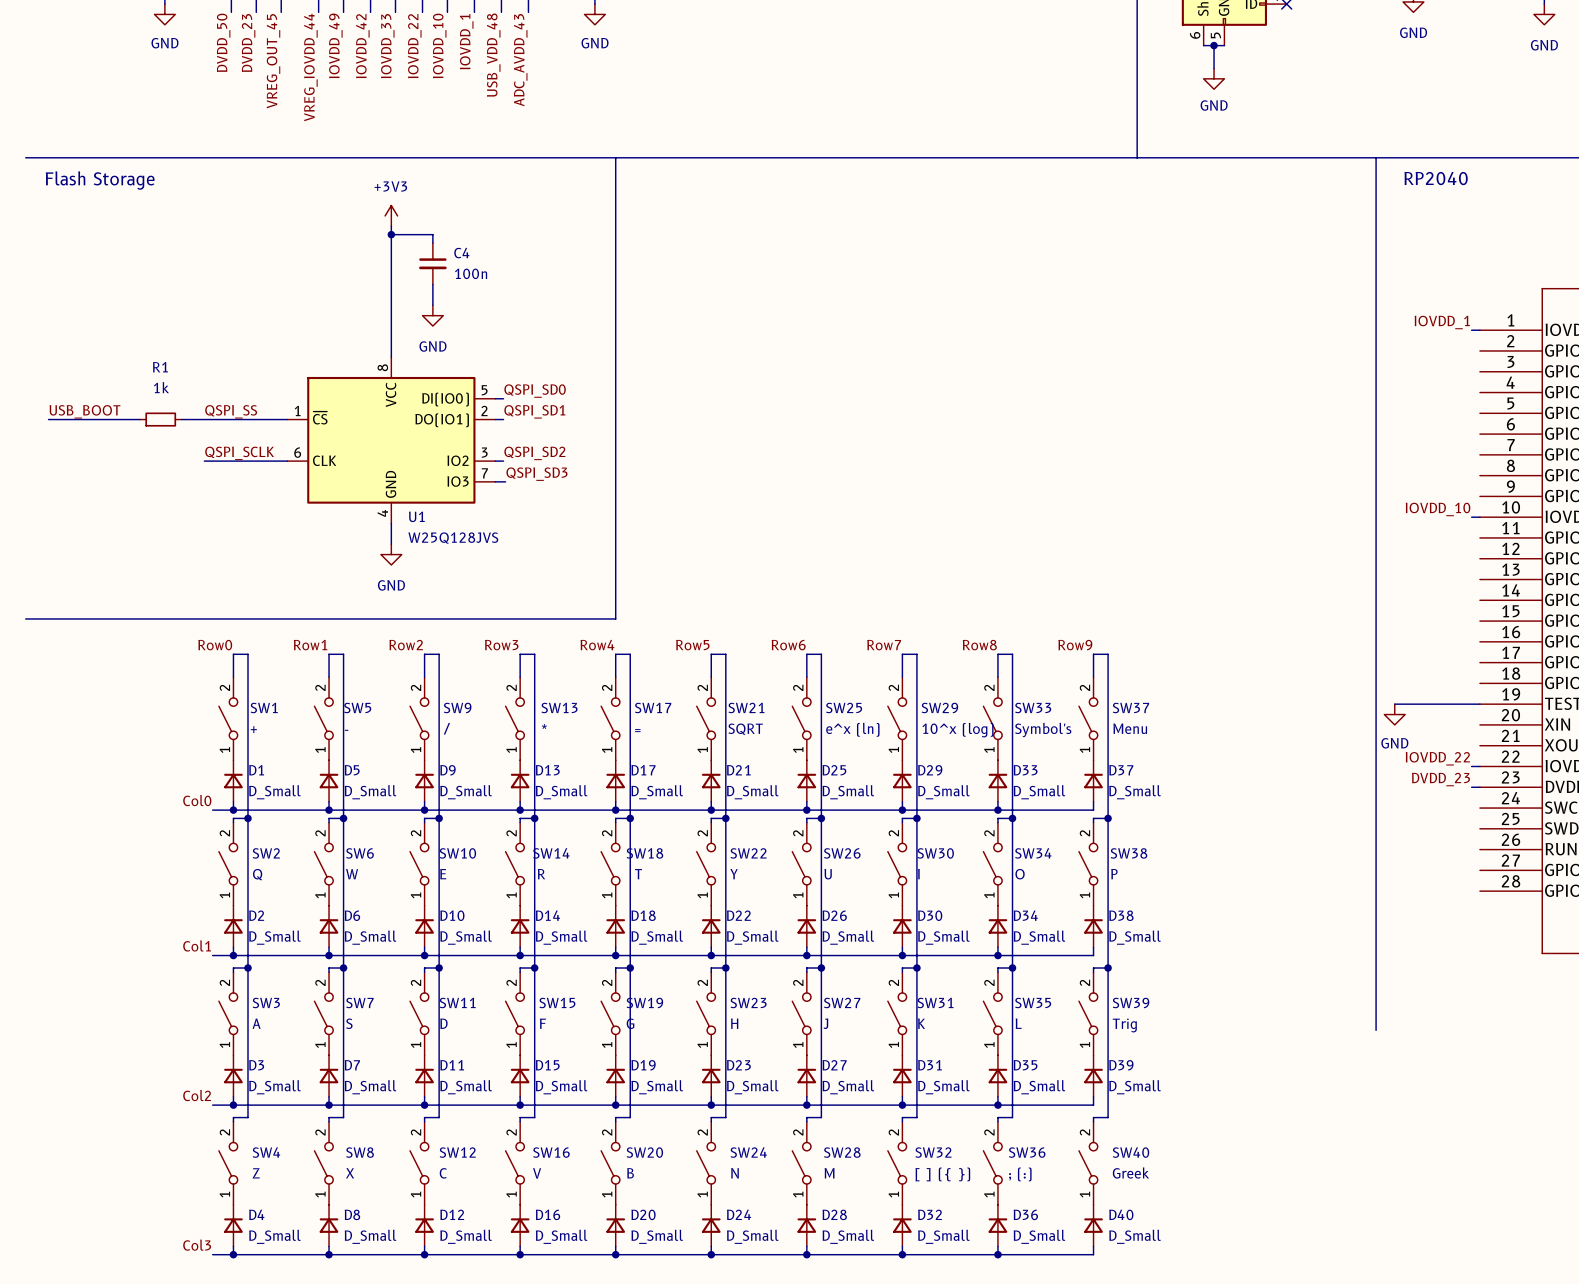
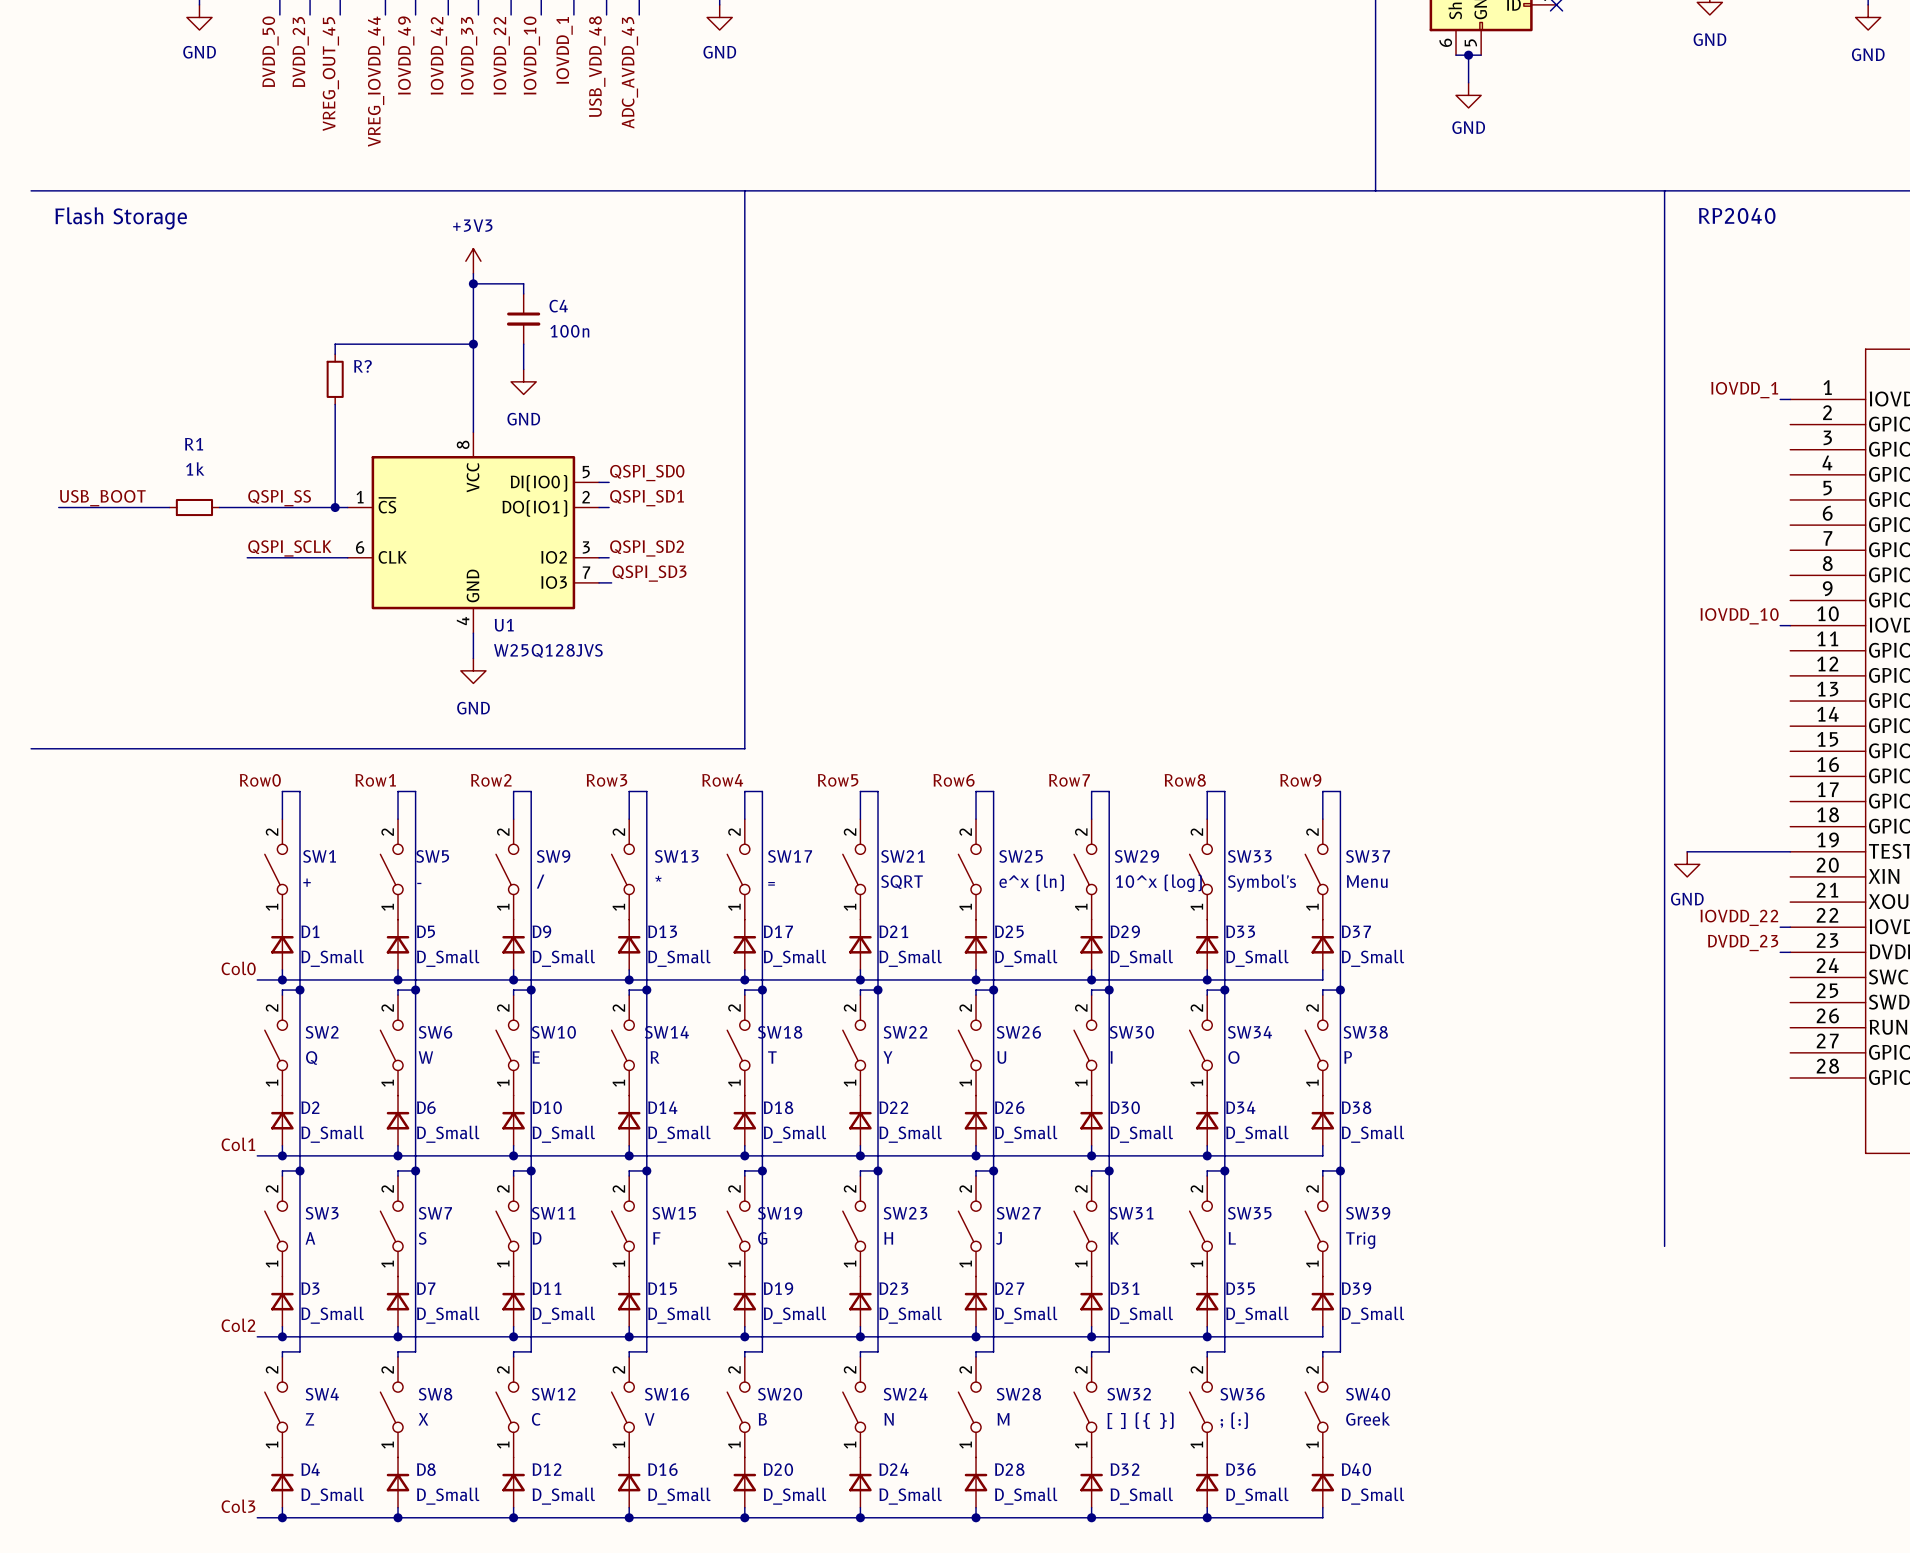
wire: none -> (473, 344) (335, 344) (335, 354)
junction: none -> (473, 344)
R?: none -> (335, 379)
wire: none -> (335, 404) (335, 507)
junction: none -> (335, 507)

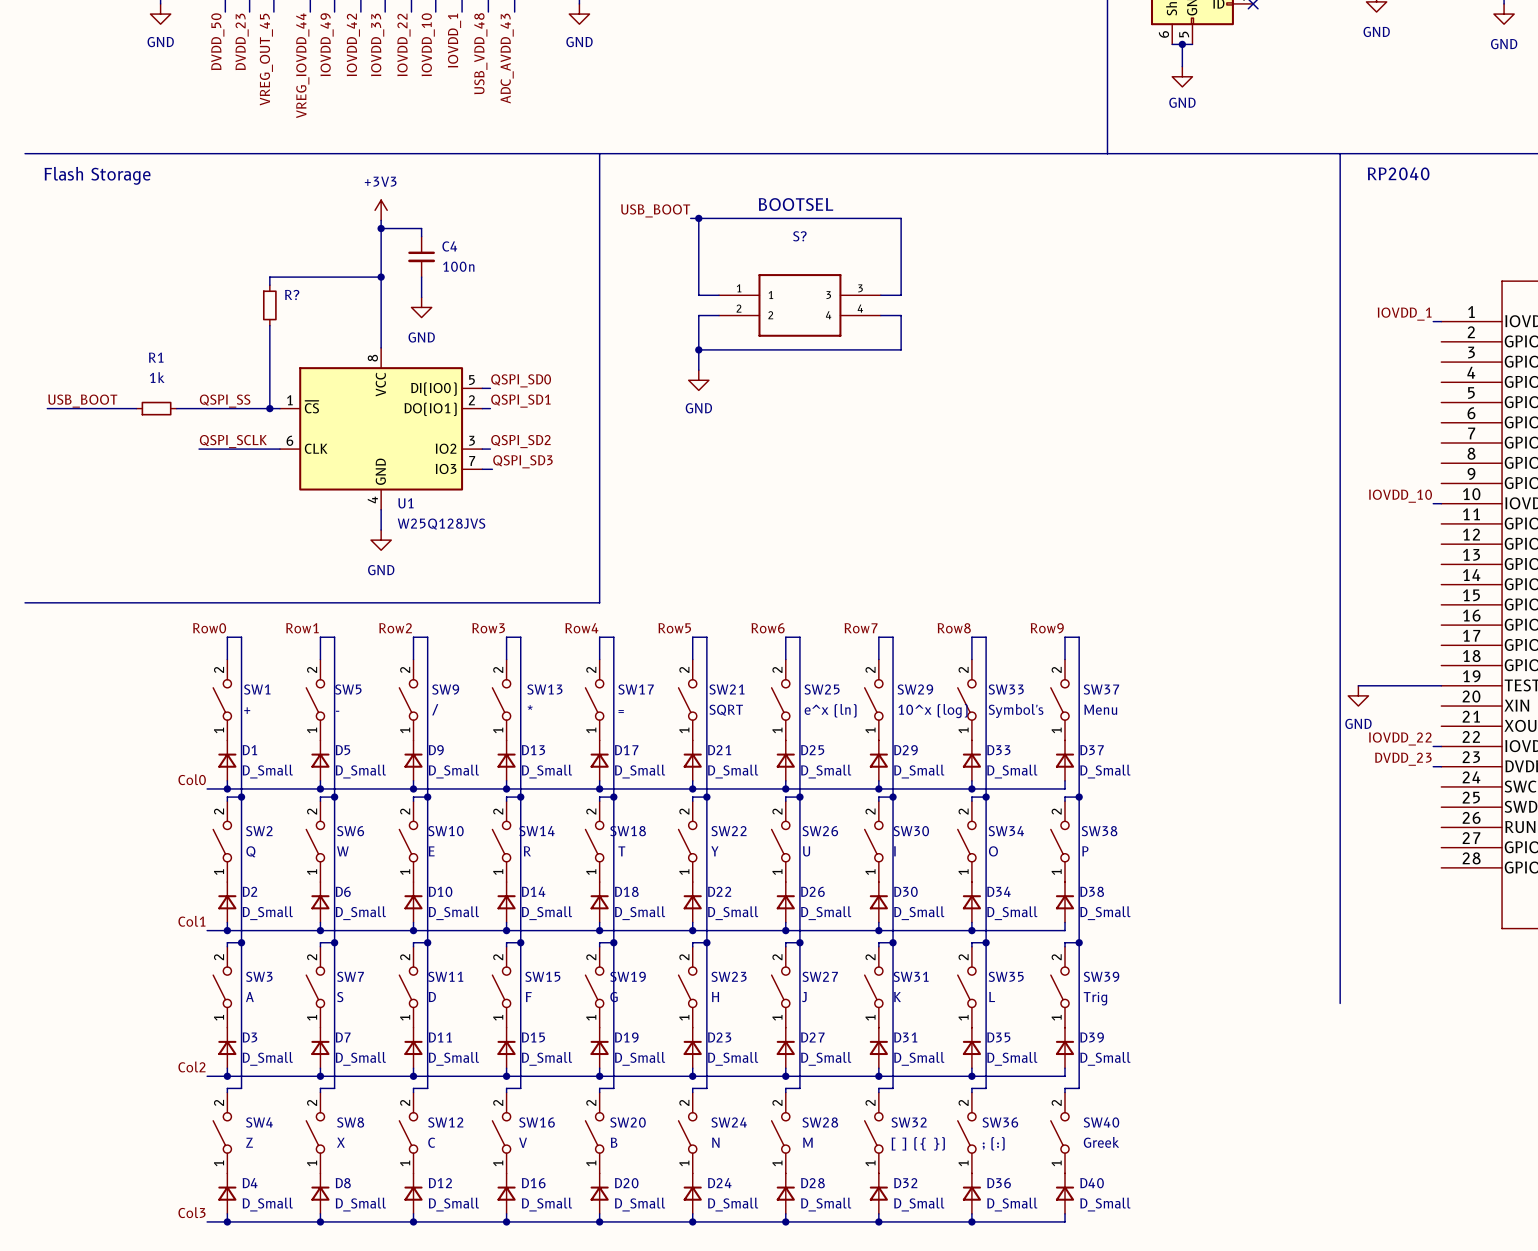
text: none -> BOOTSEL (796, 204)
label: none -> USB_BOOT (655, 210)
wire: none -> (690, 218) (901, 218) (901, 295) (880, 295)
wire: none -> (698, 218) (698, 295) (719, 295)
junction: none -> (698, 218)
S?: none -> (799, 305)
wire: none -> (719, 315) (698, 315) (698, 370)
wire: none -> (880, 315) (901, 315) (901, 349) (698, 349)
junction: none -> (698, 349)
power symbol: none -> GND (698, 380)

